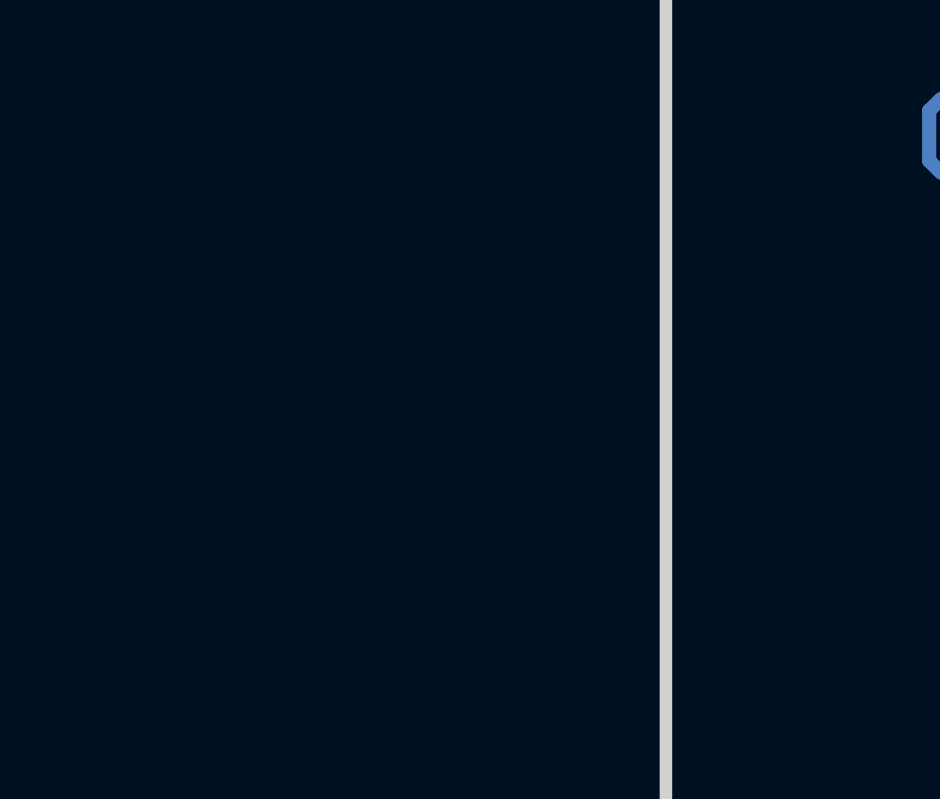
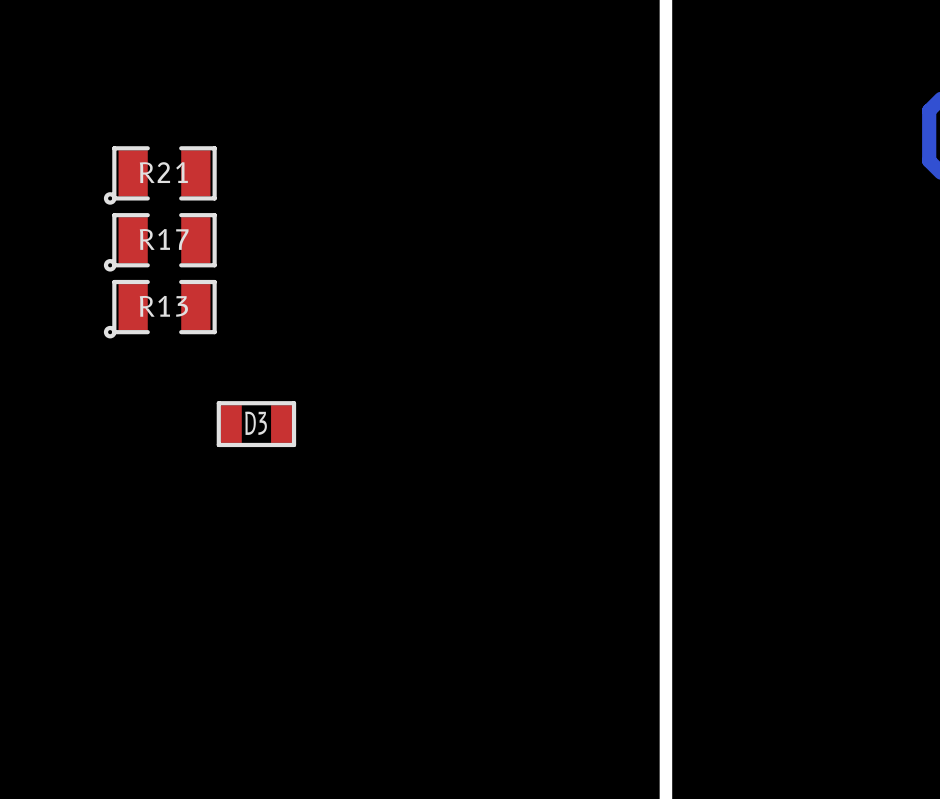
R21: none -> (160, 175)
R17: none -> (160, 242)
R13: none -> (160, 309)
D3: none -> (256, 424)

